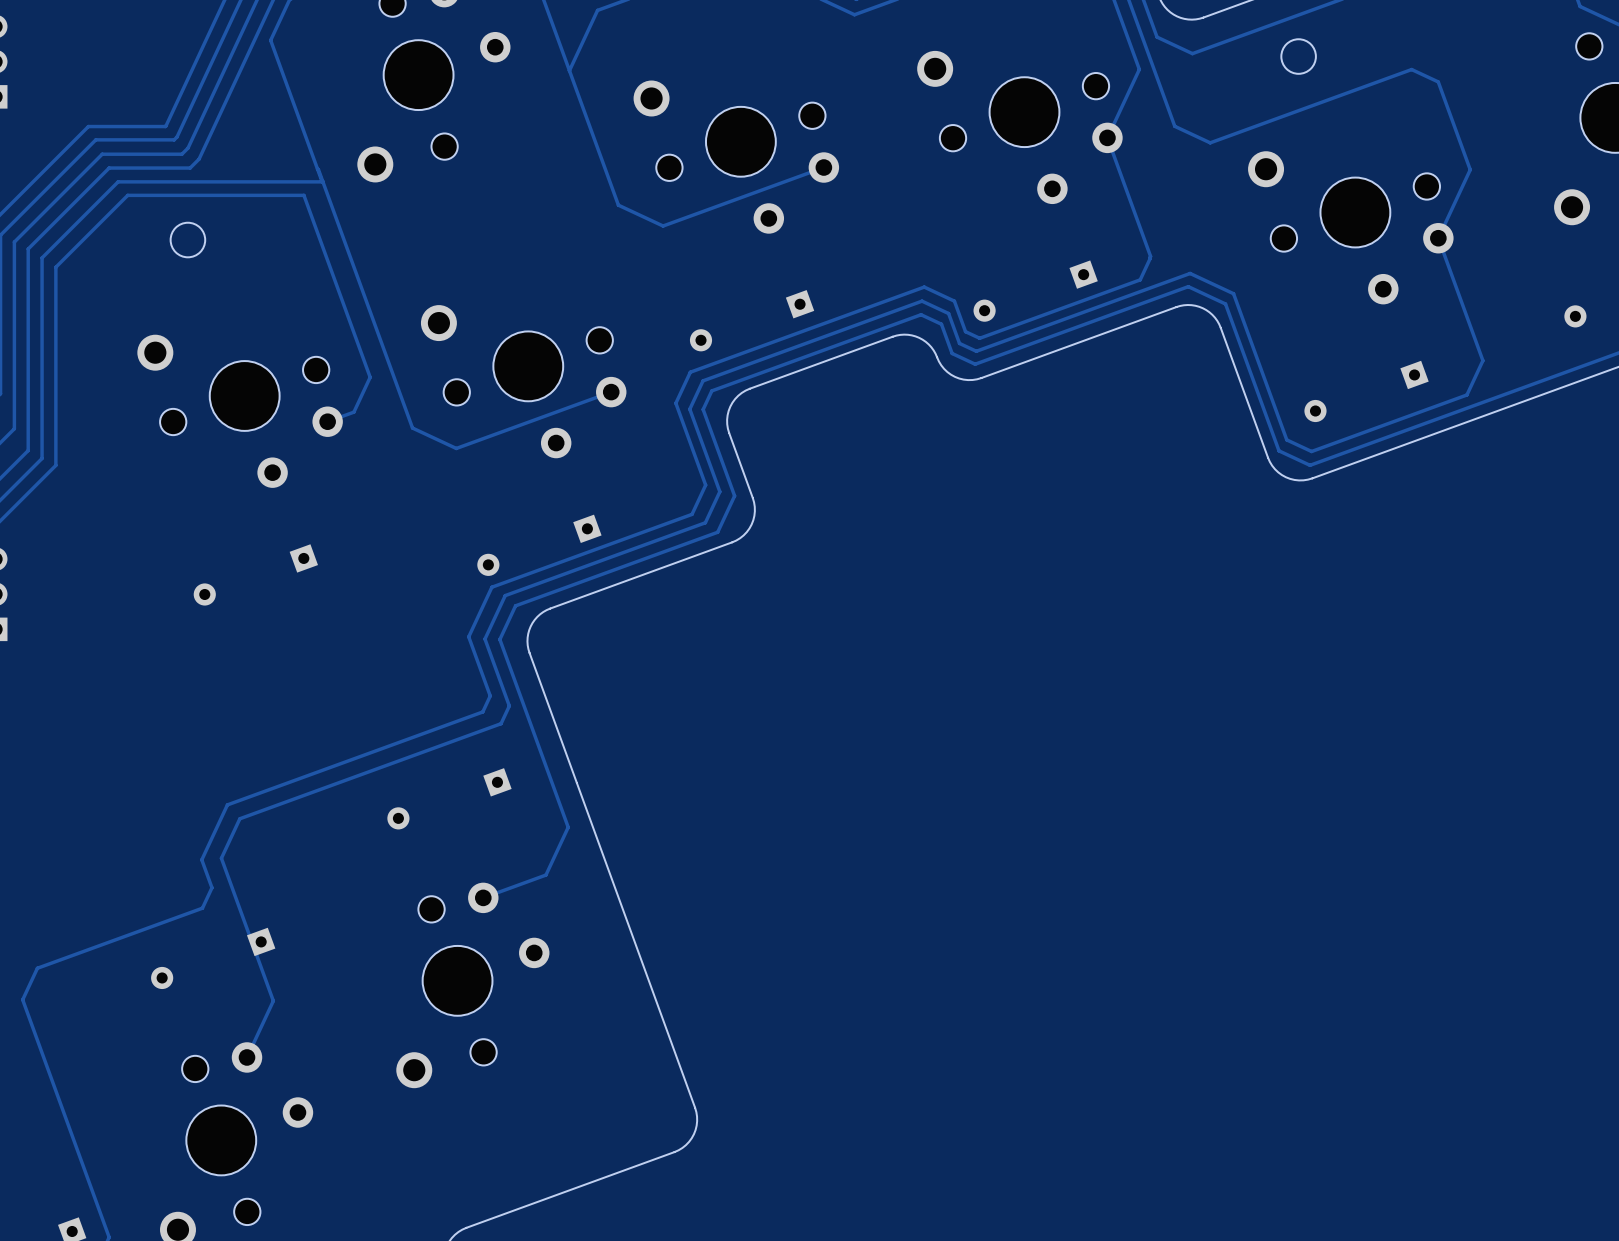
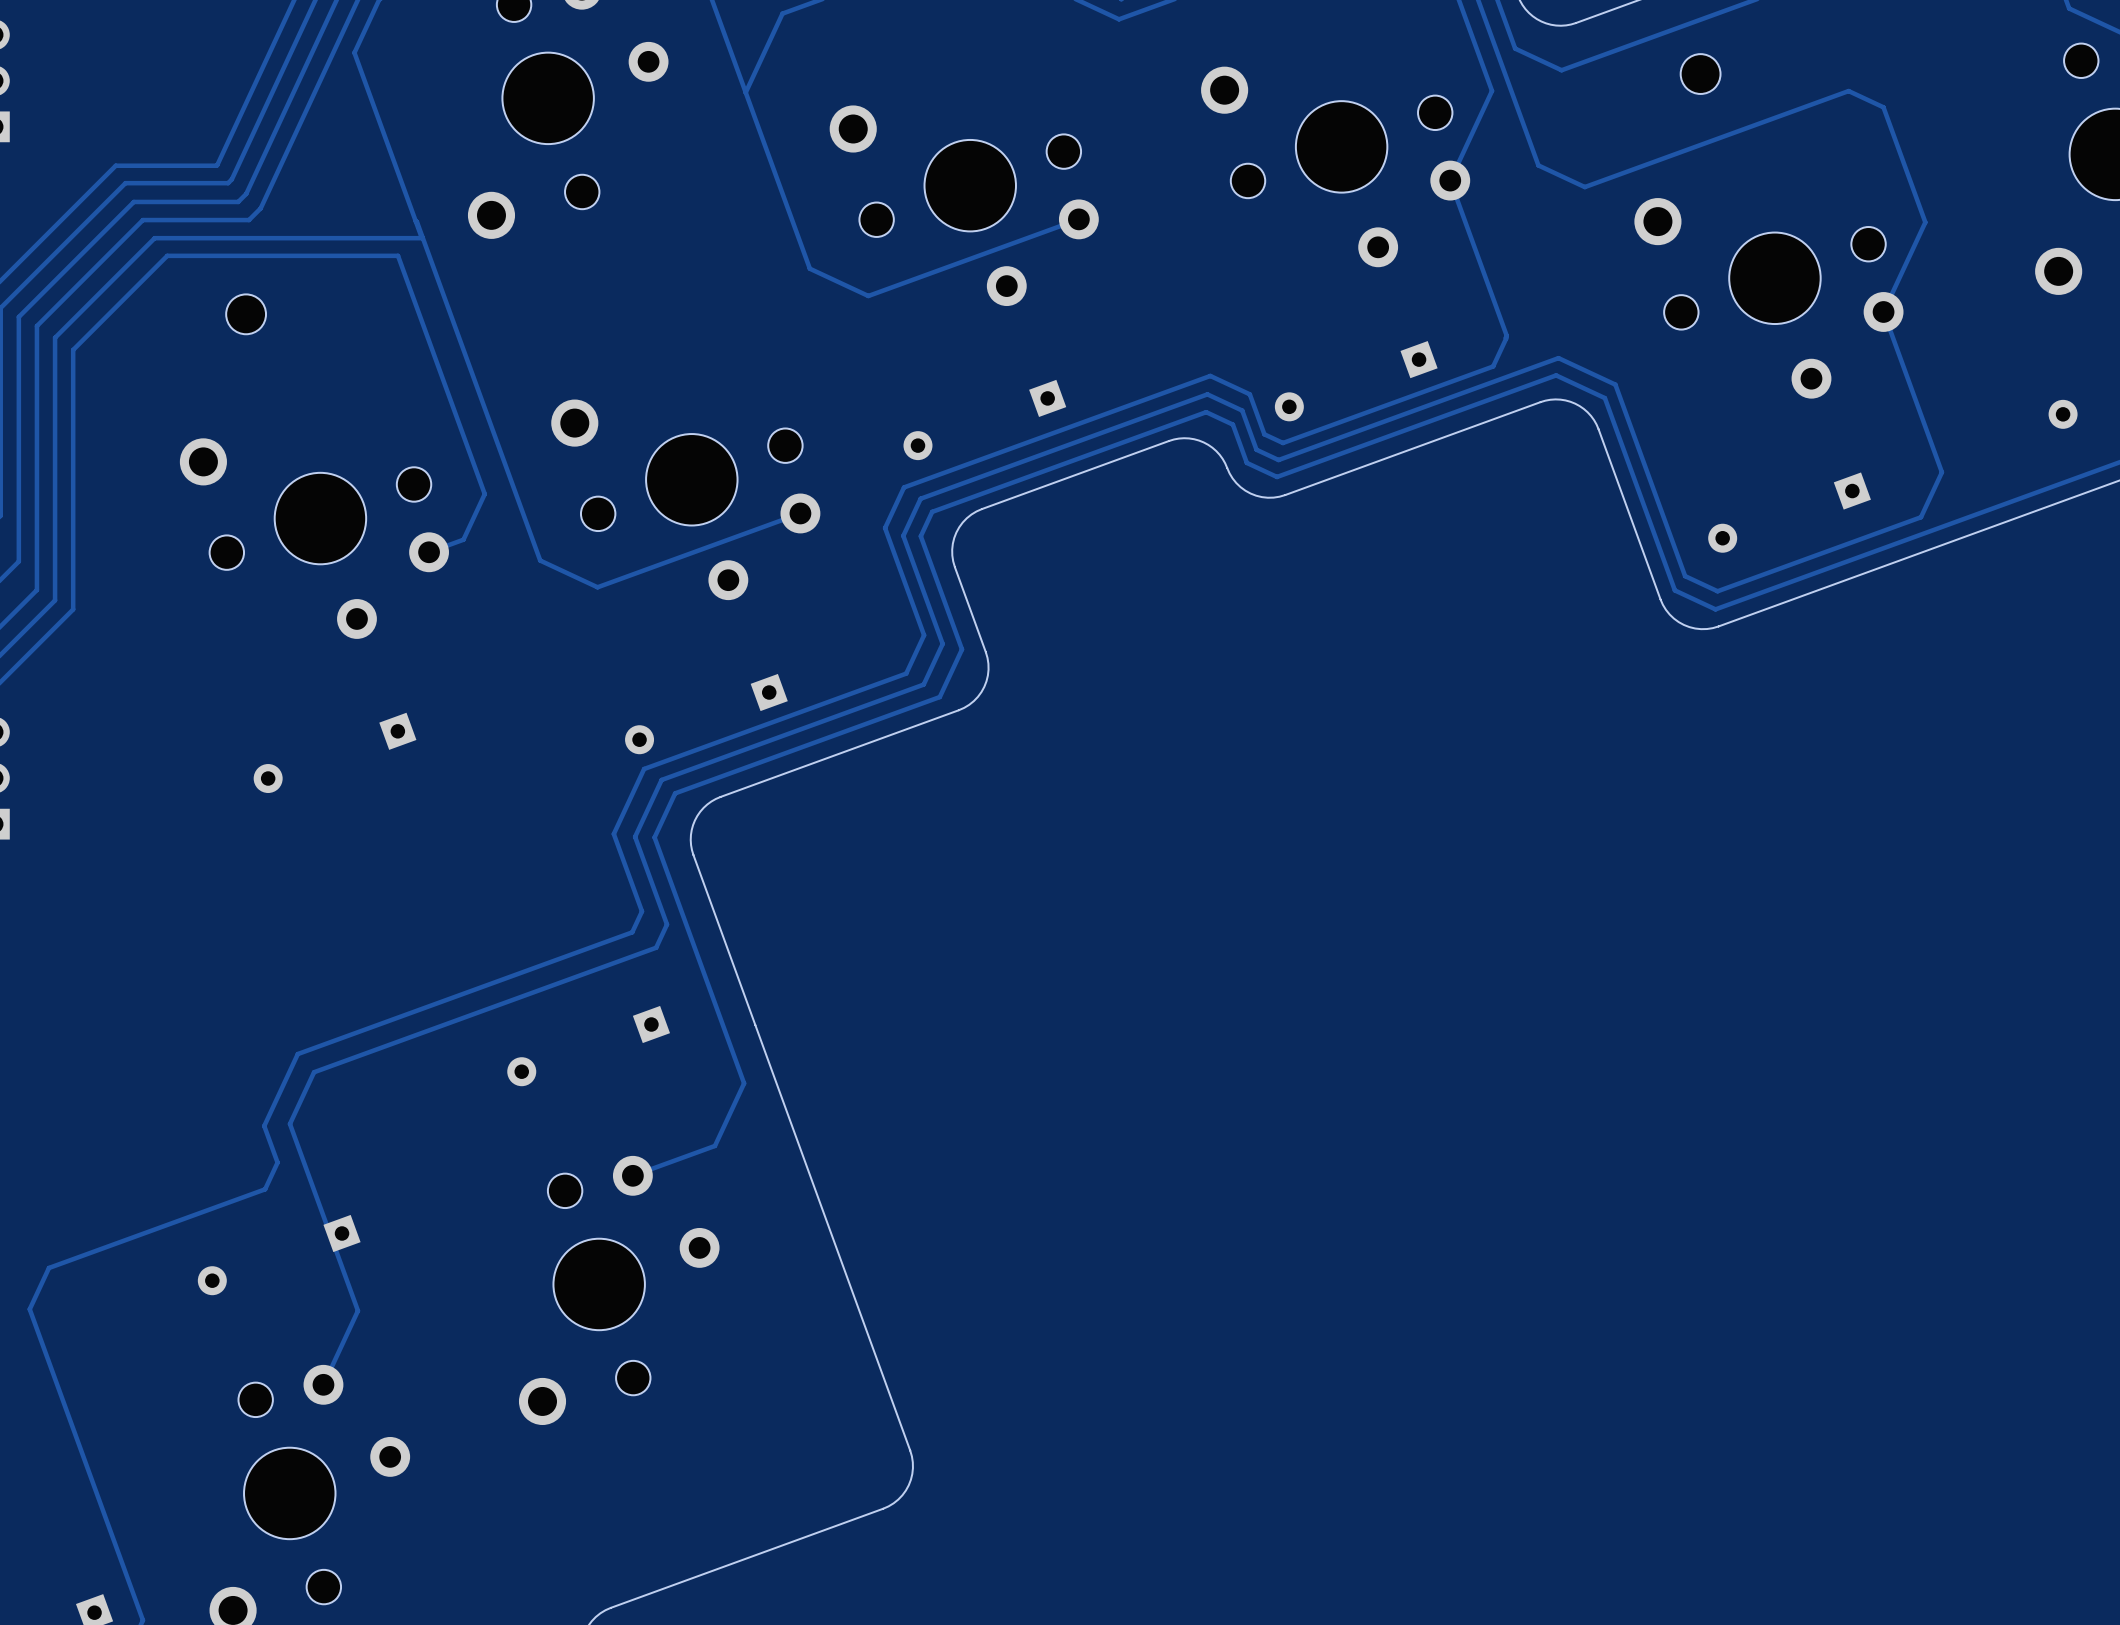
round board edge: [1280, 38, 1317, 75] -> none
part: none -> (1700, 74)
round board edge: [169, 222, 206, 259] -> none
part: none -> (246, 314)

